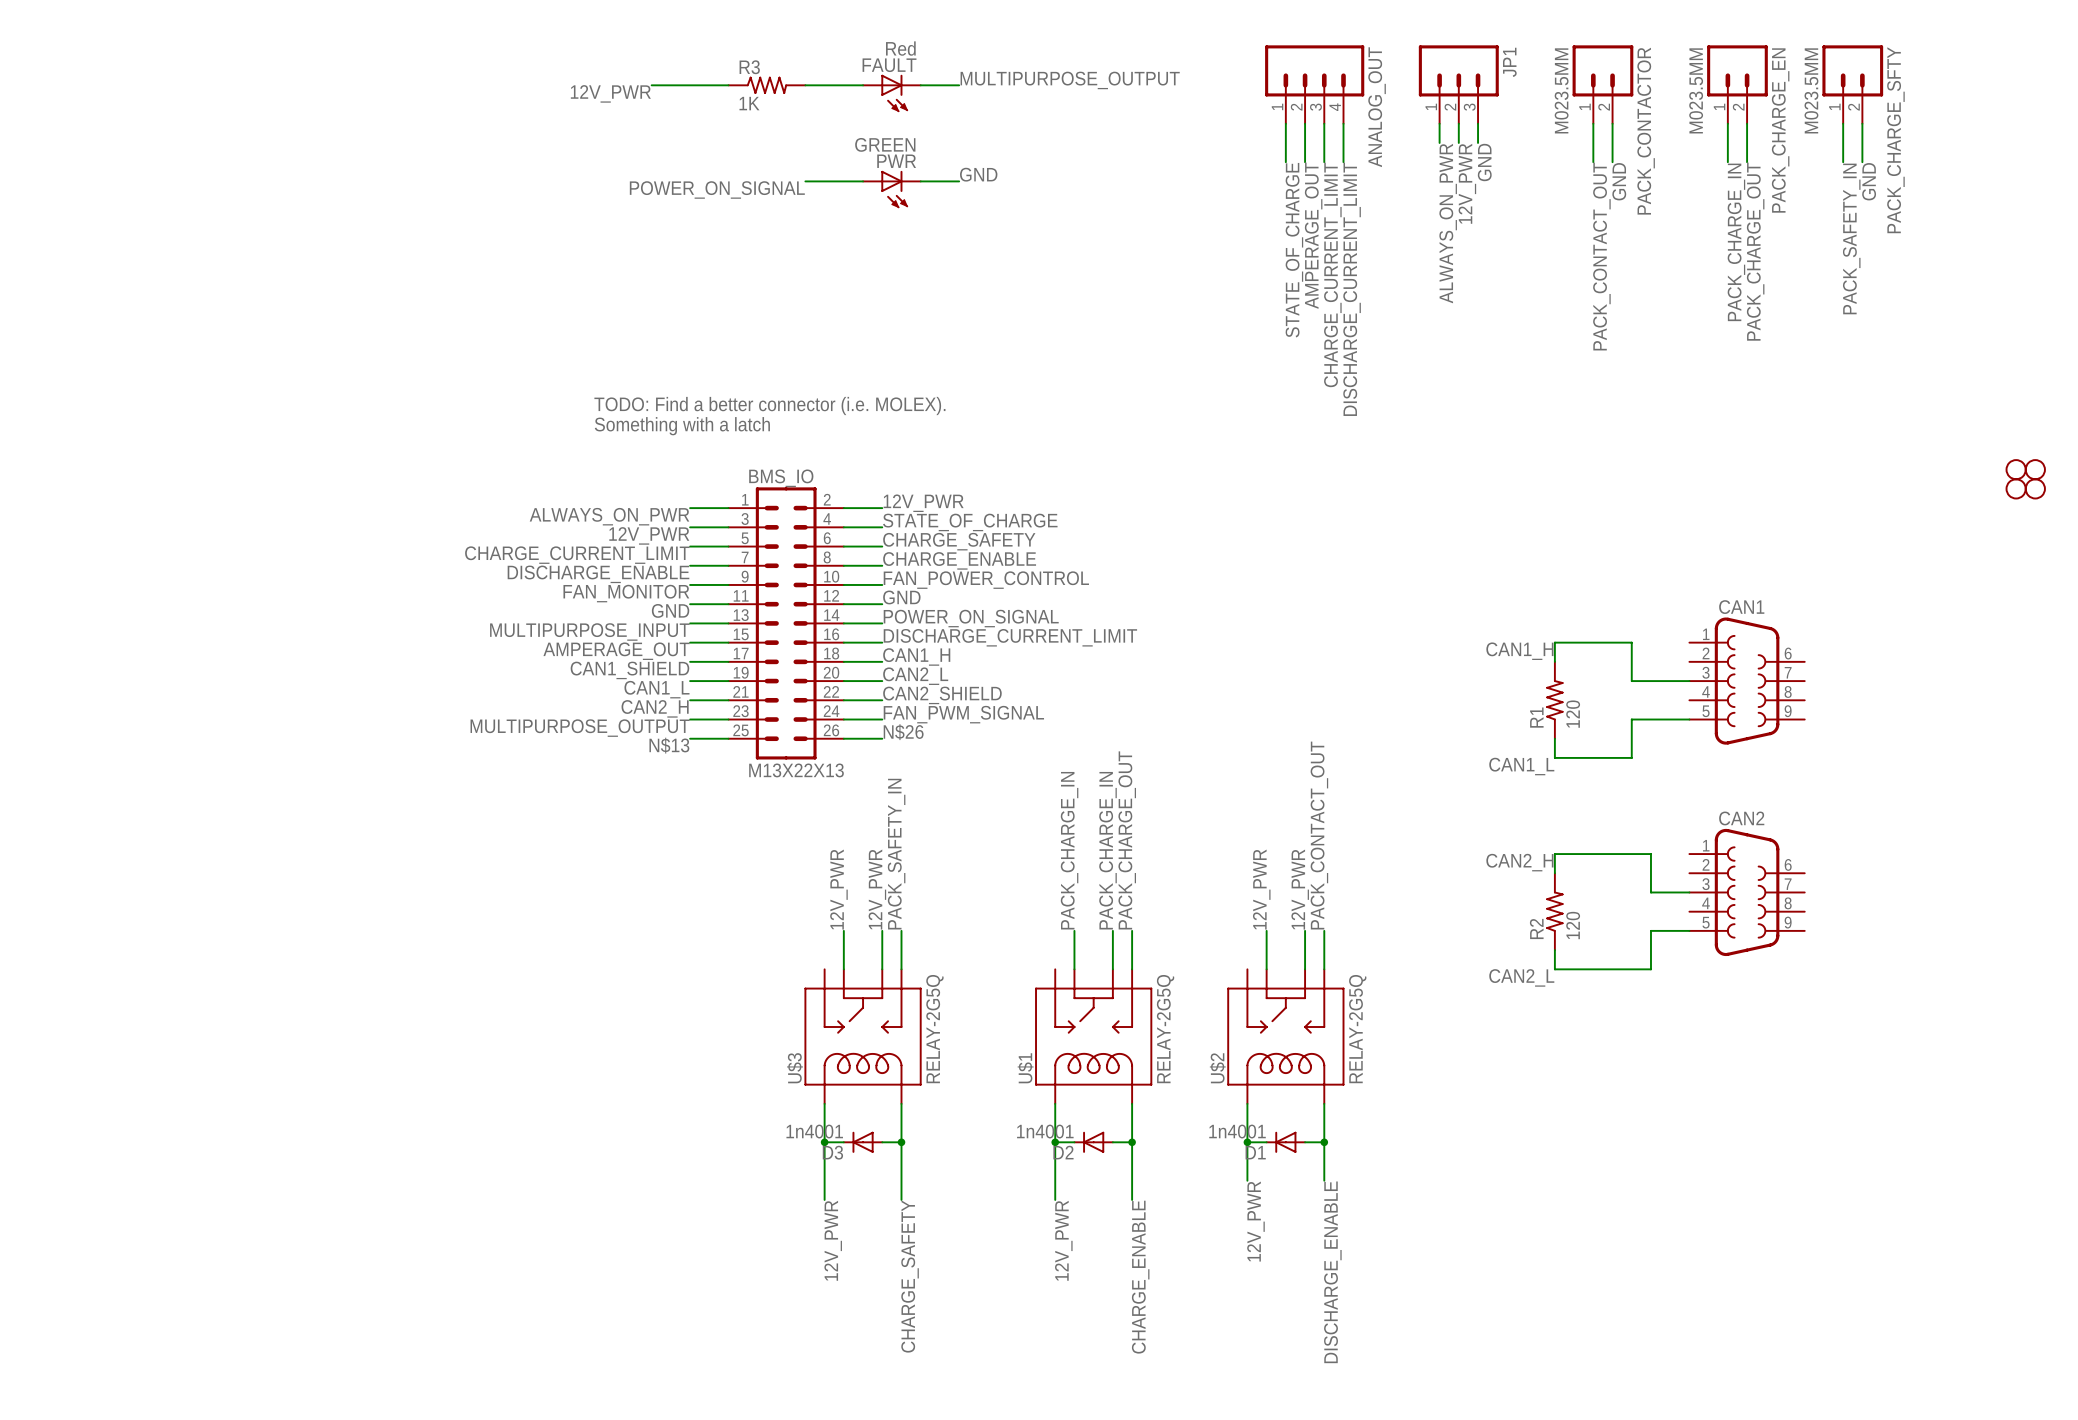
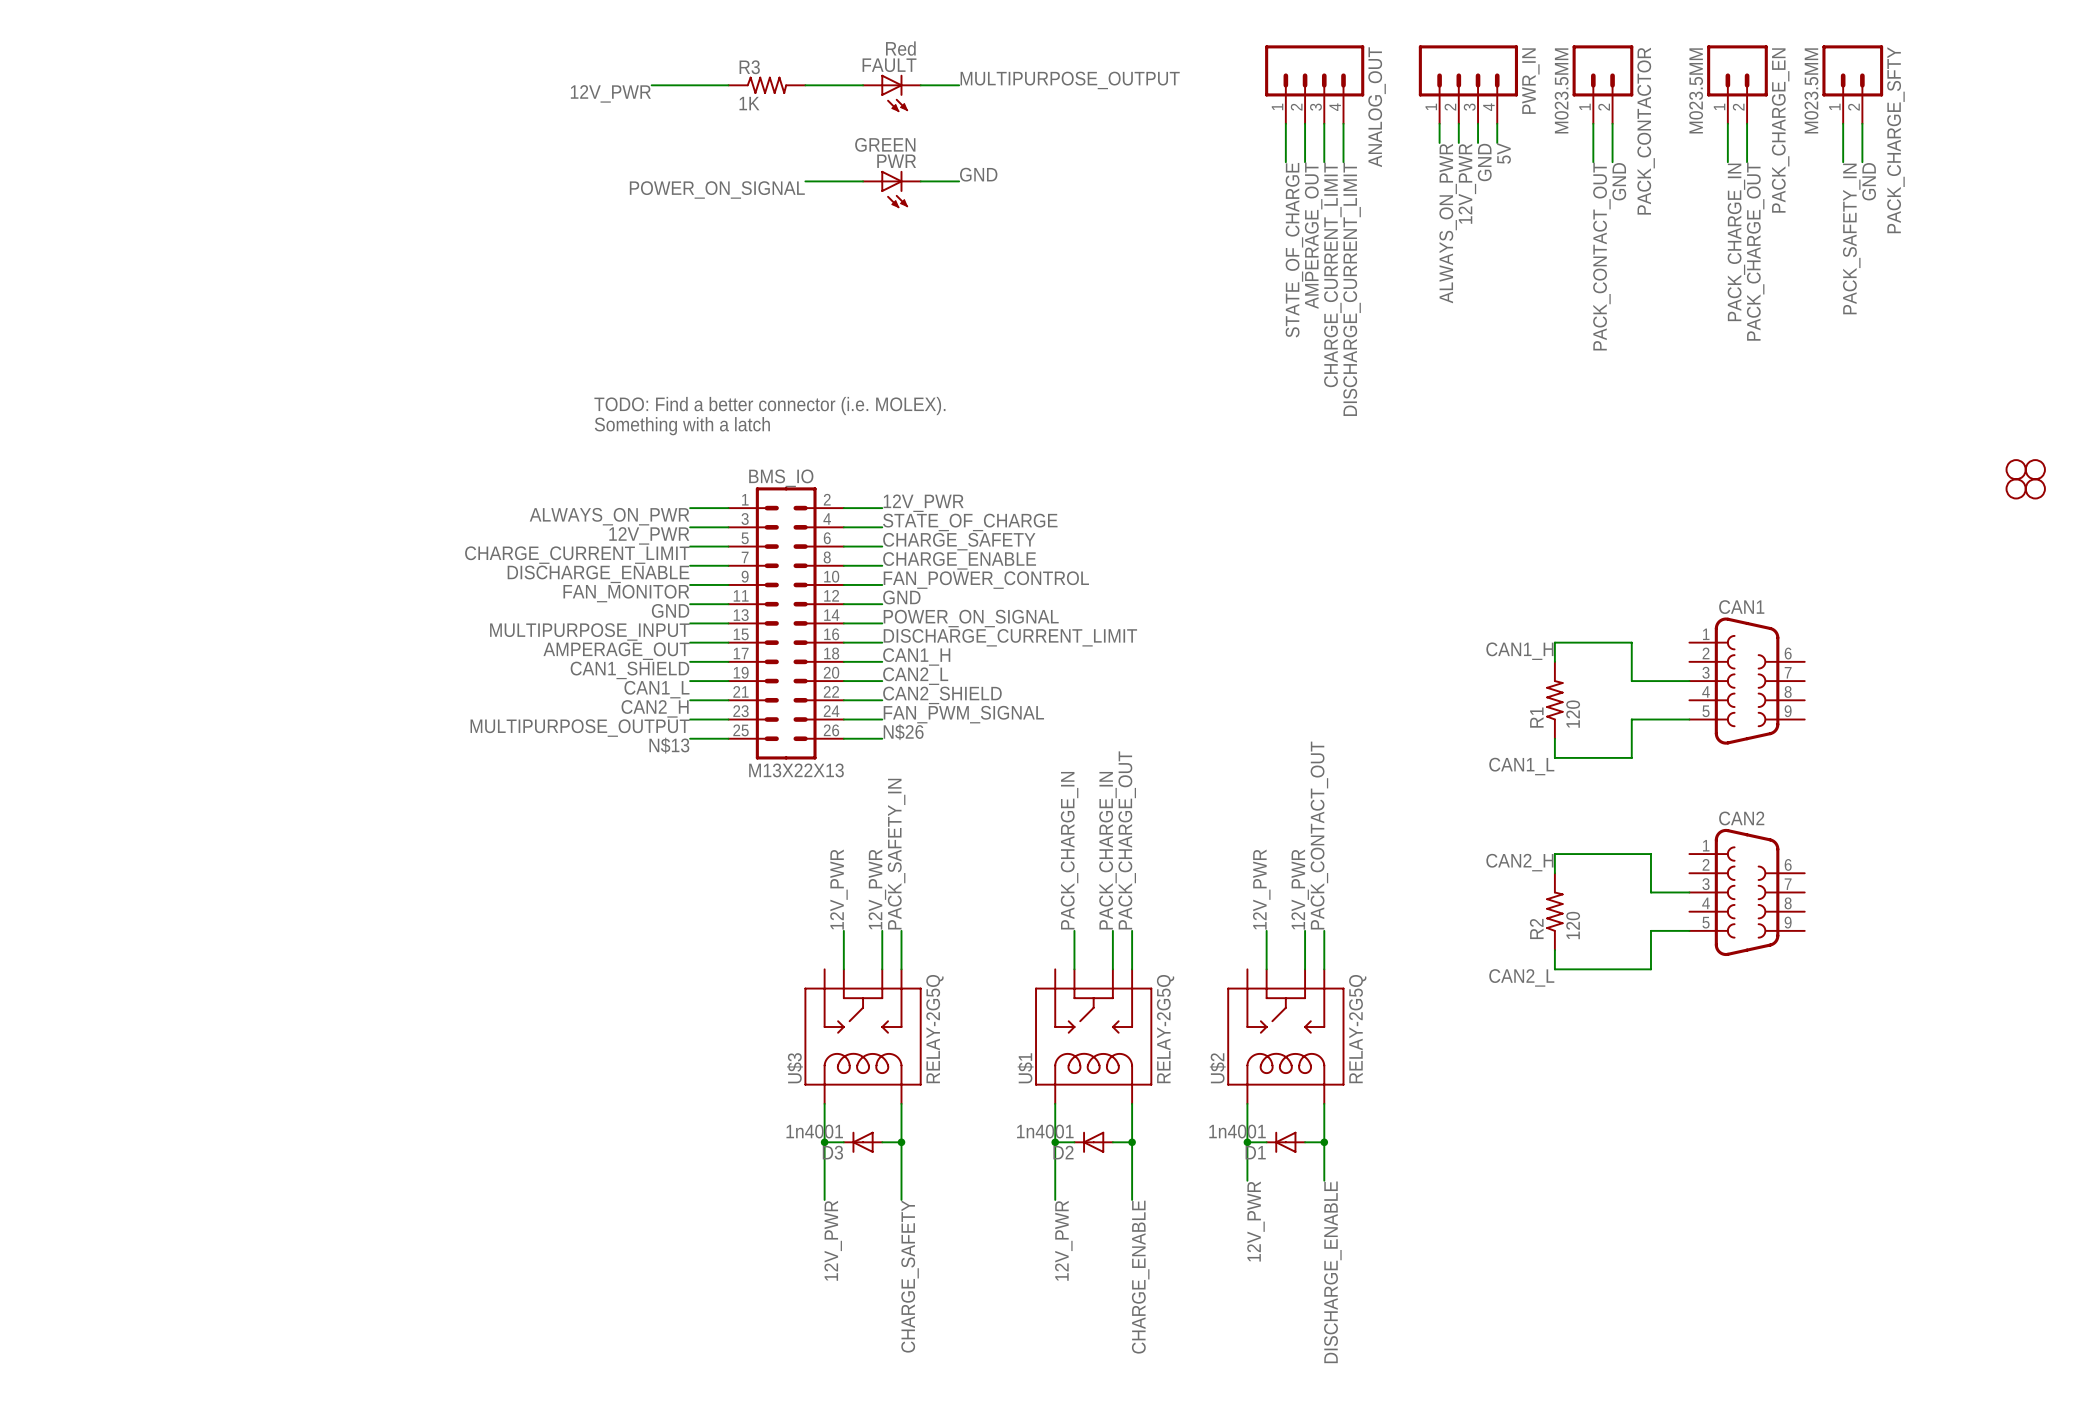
JP1: (1458, 84) -> none
PWR_IN: none -> (1468, 84)
wire: none -> (1497, 123) (1497, 142)
label: none -> 5V (1504, 153)

